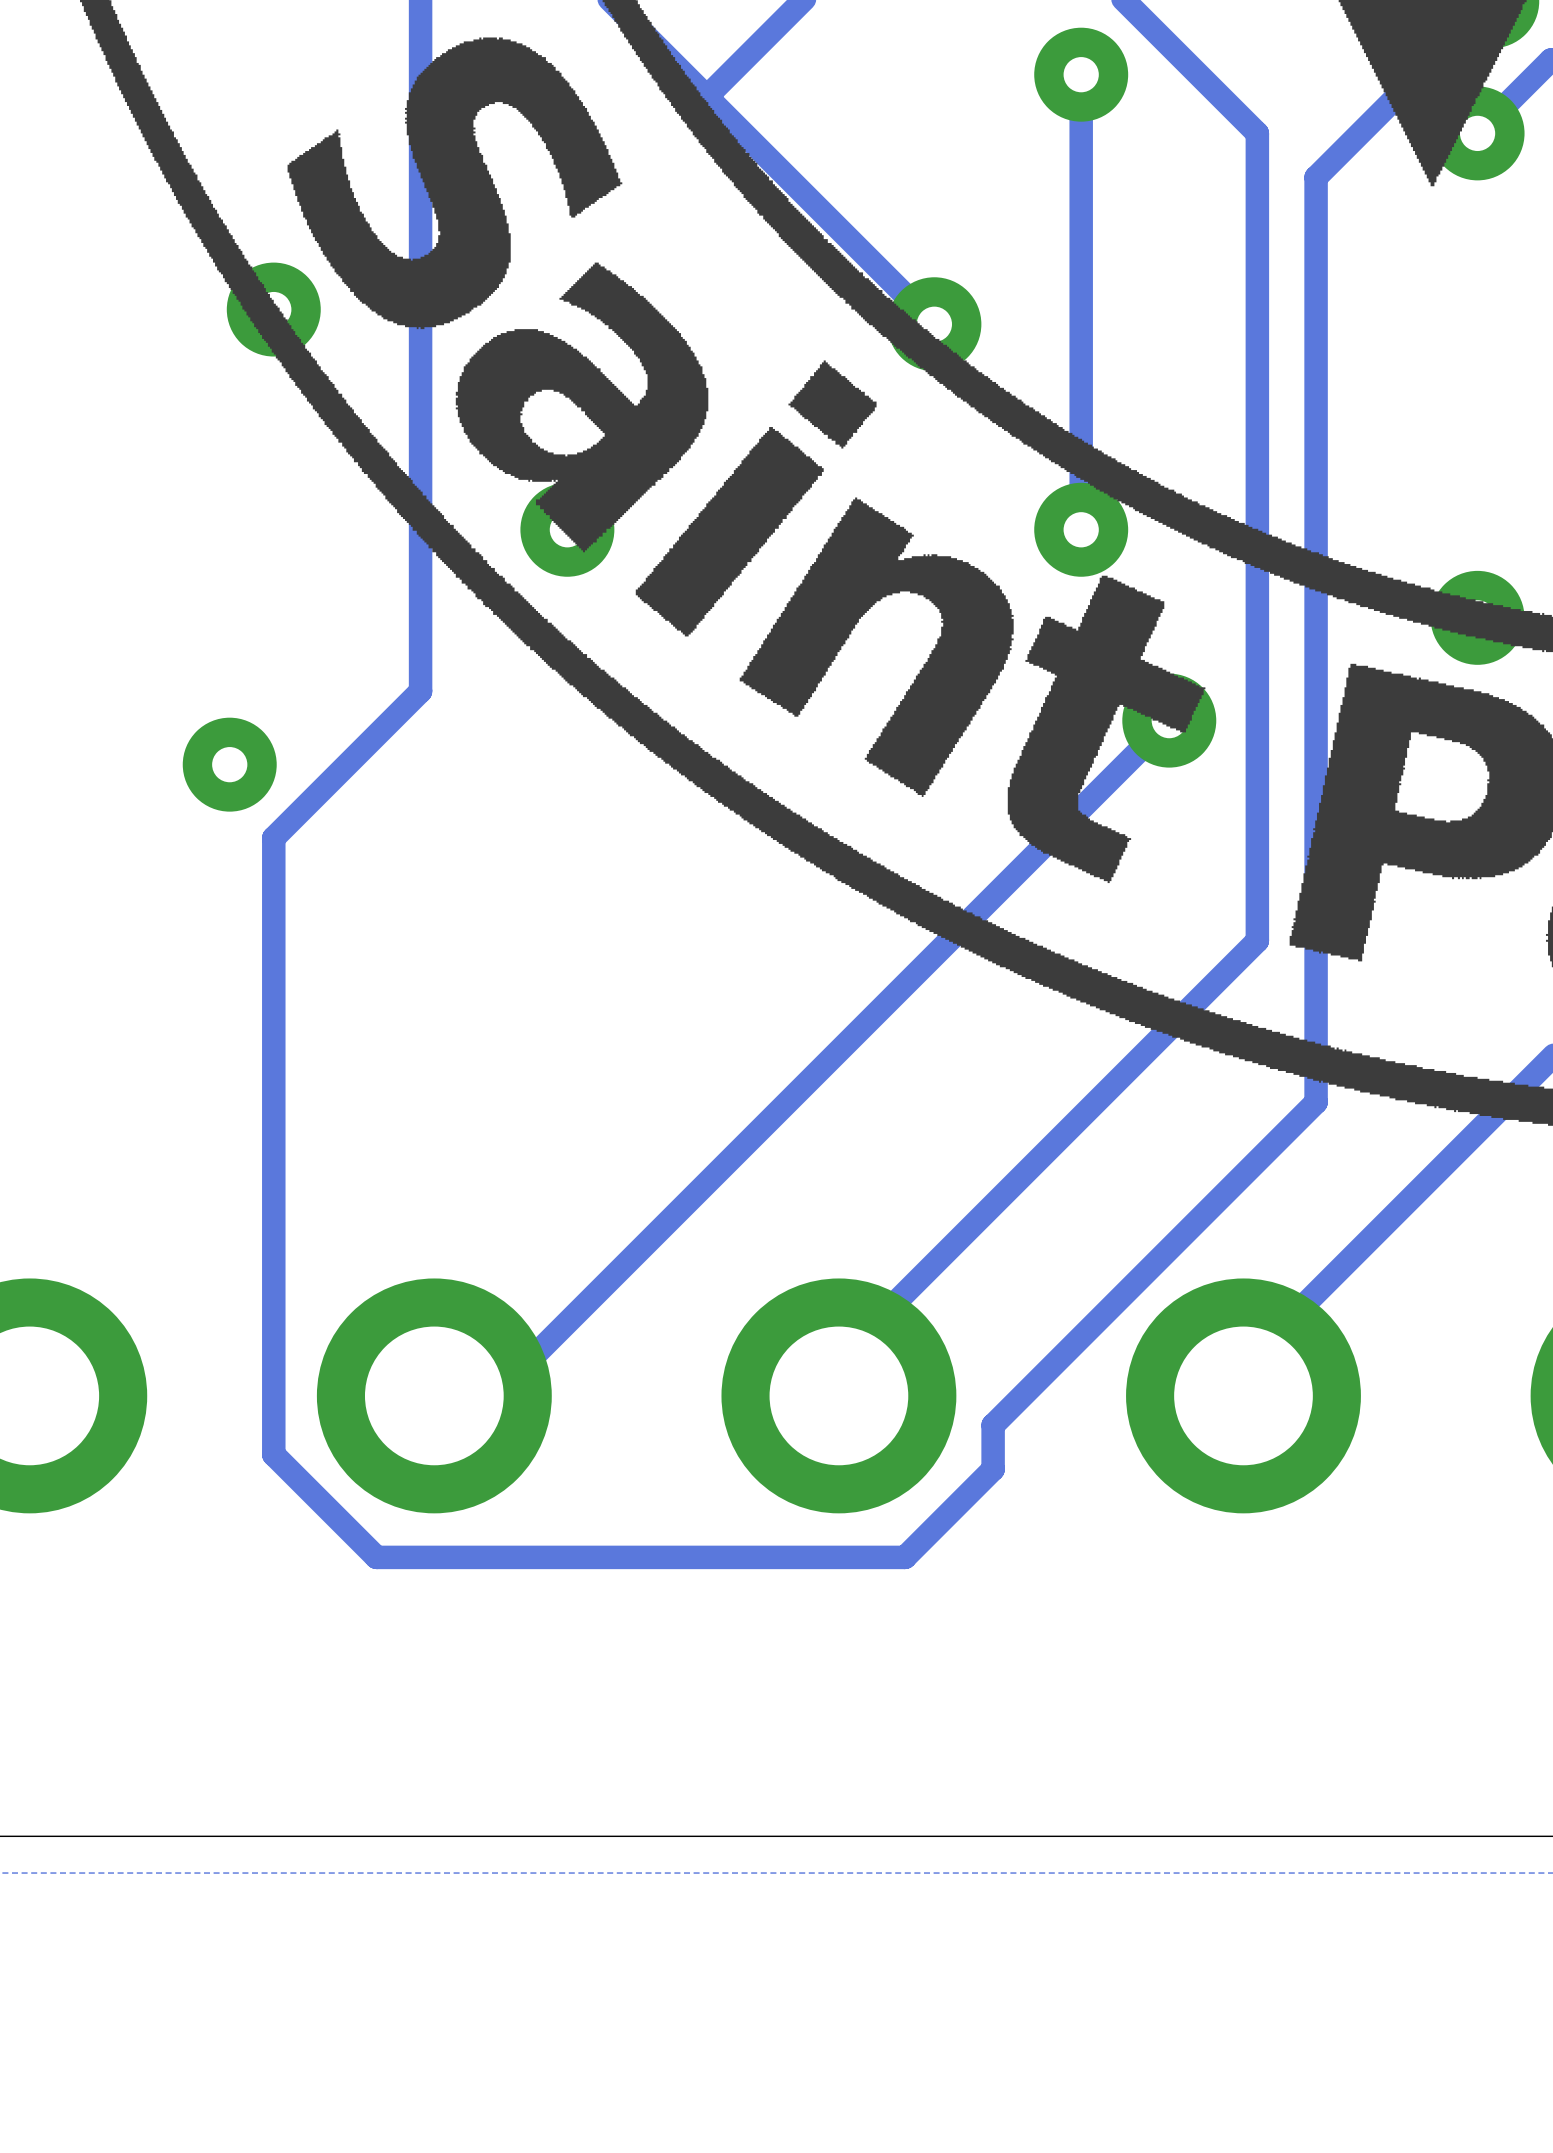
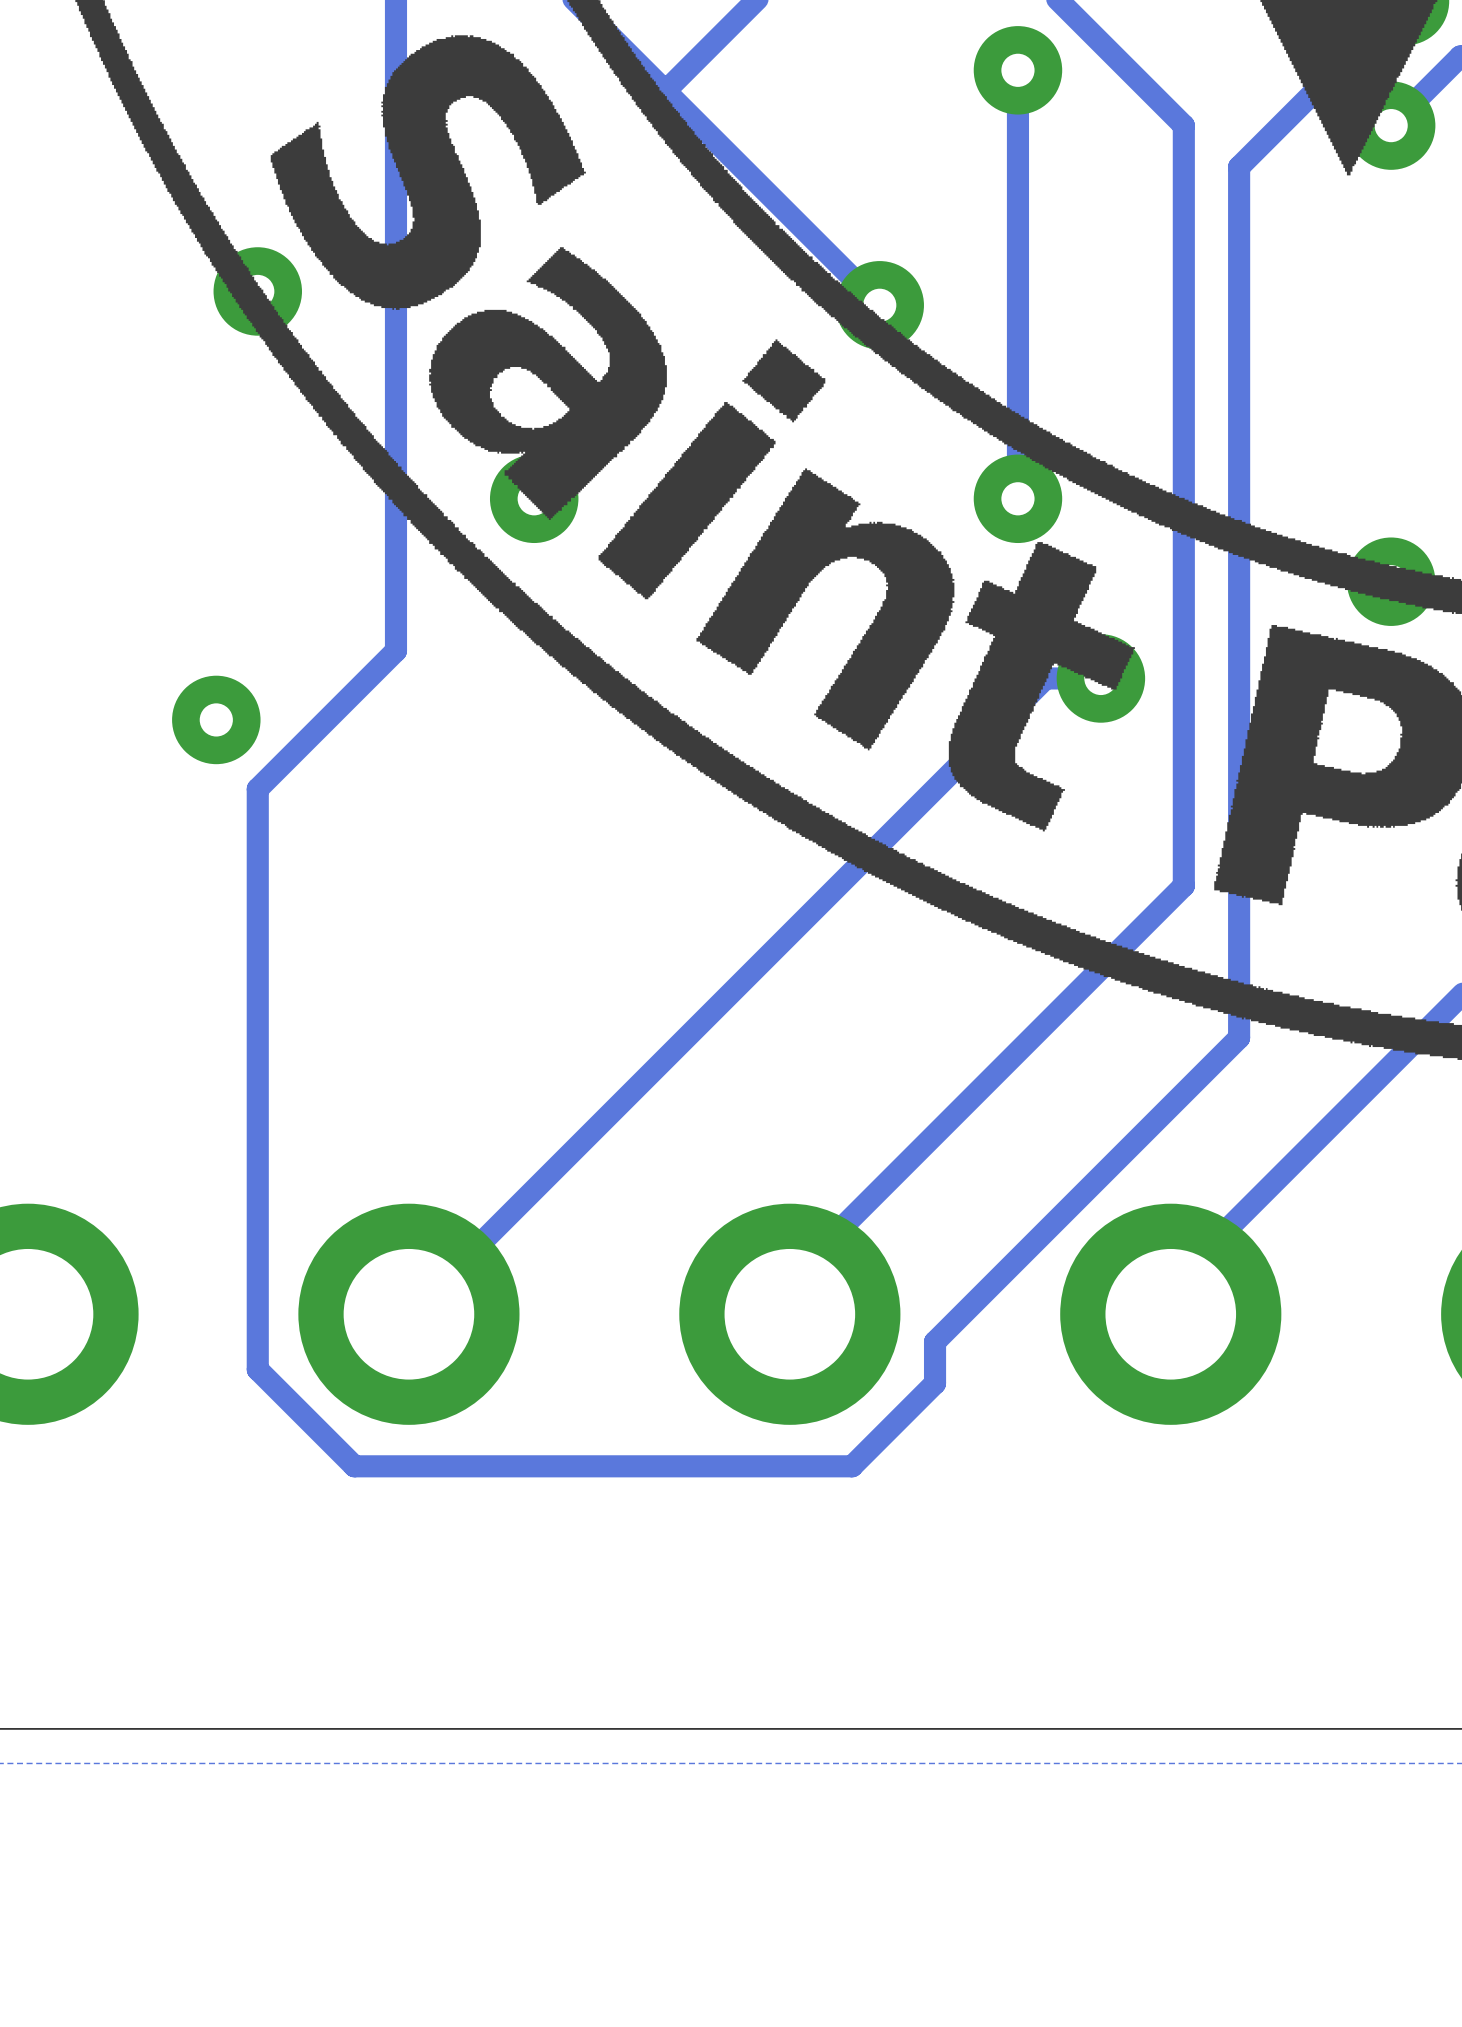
track: (1169, 720) (493, 1395) (435, 1395) -> (1100, 678) (1045, 678) (409, 1314)

